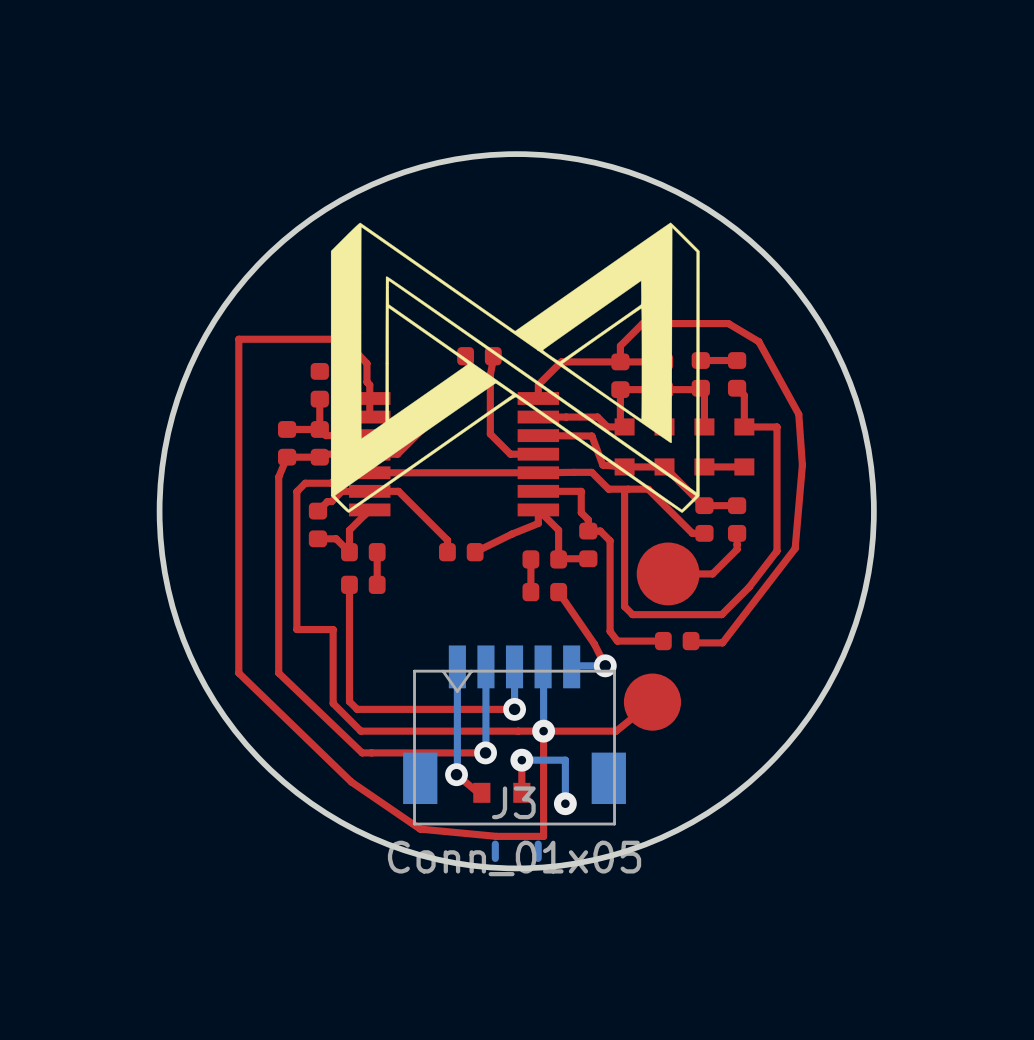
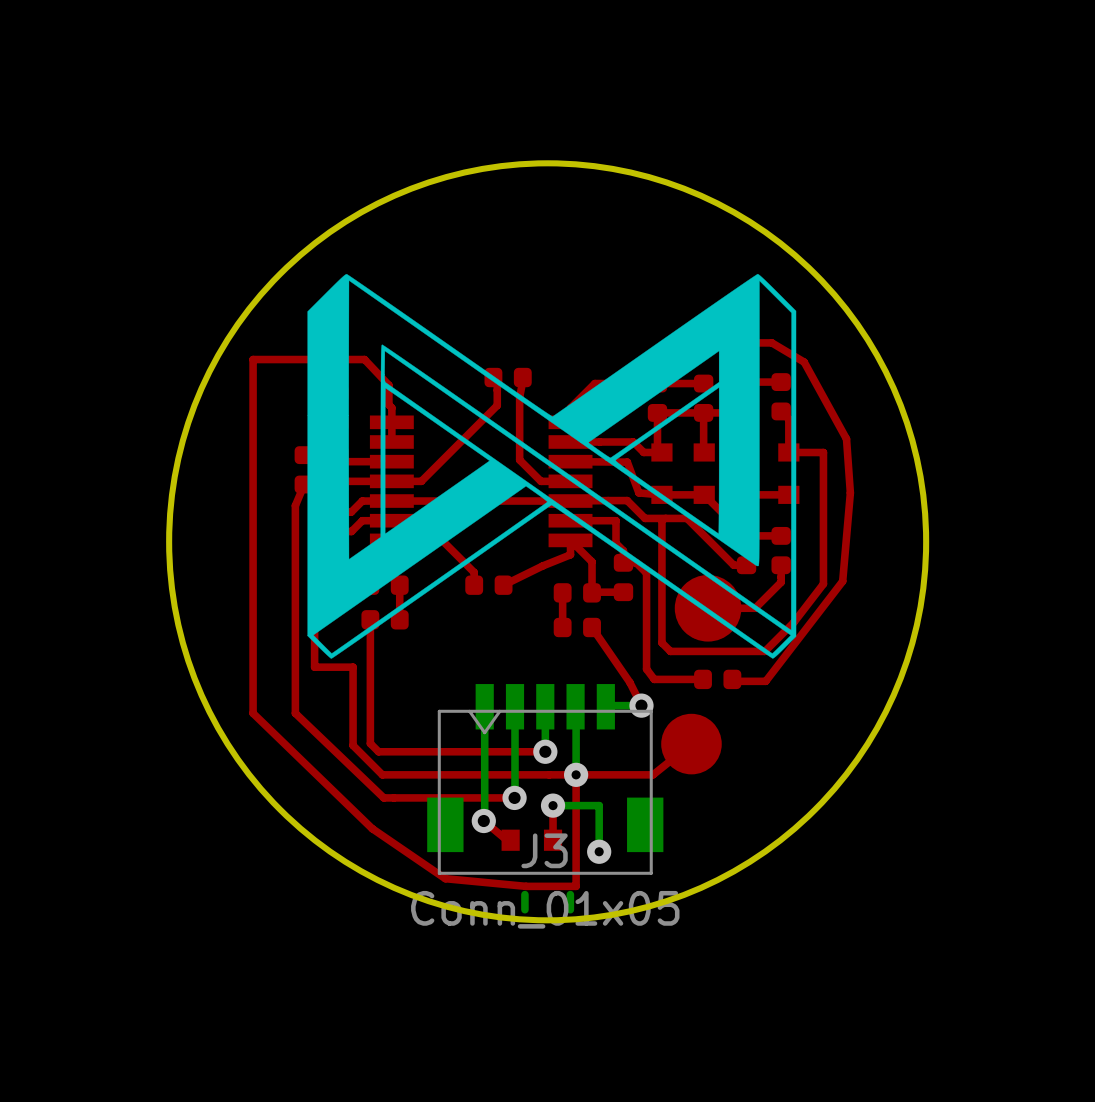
drawing: [330, 222, 700, 513] -> none
drawing: none -> [307, 273, 797, 659]

